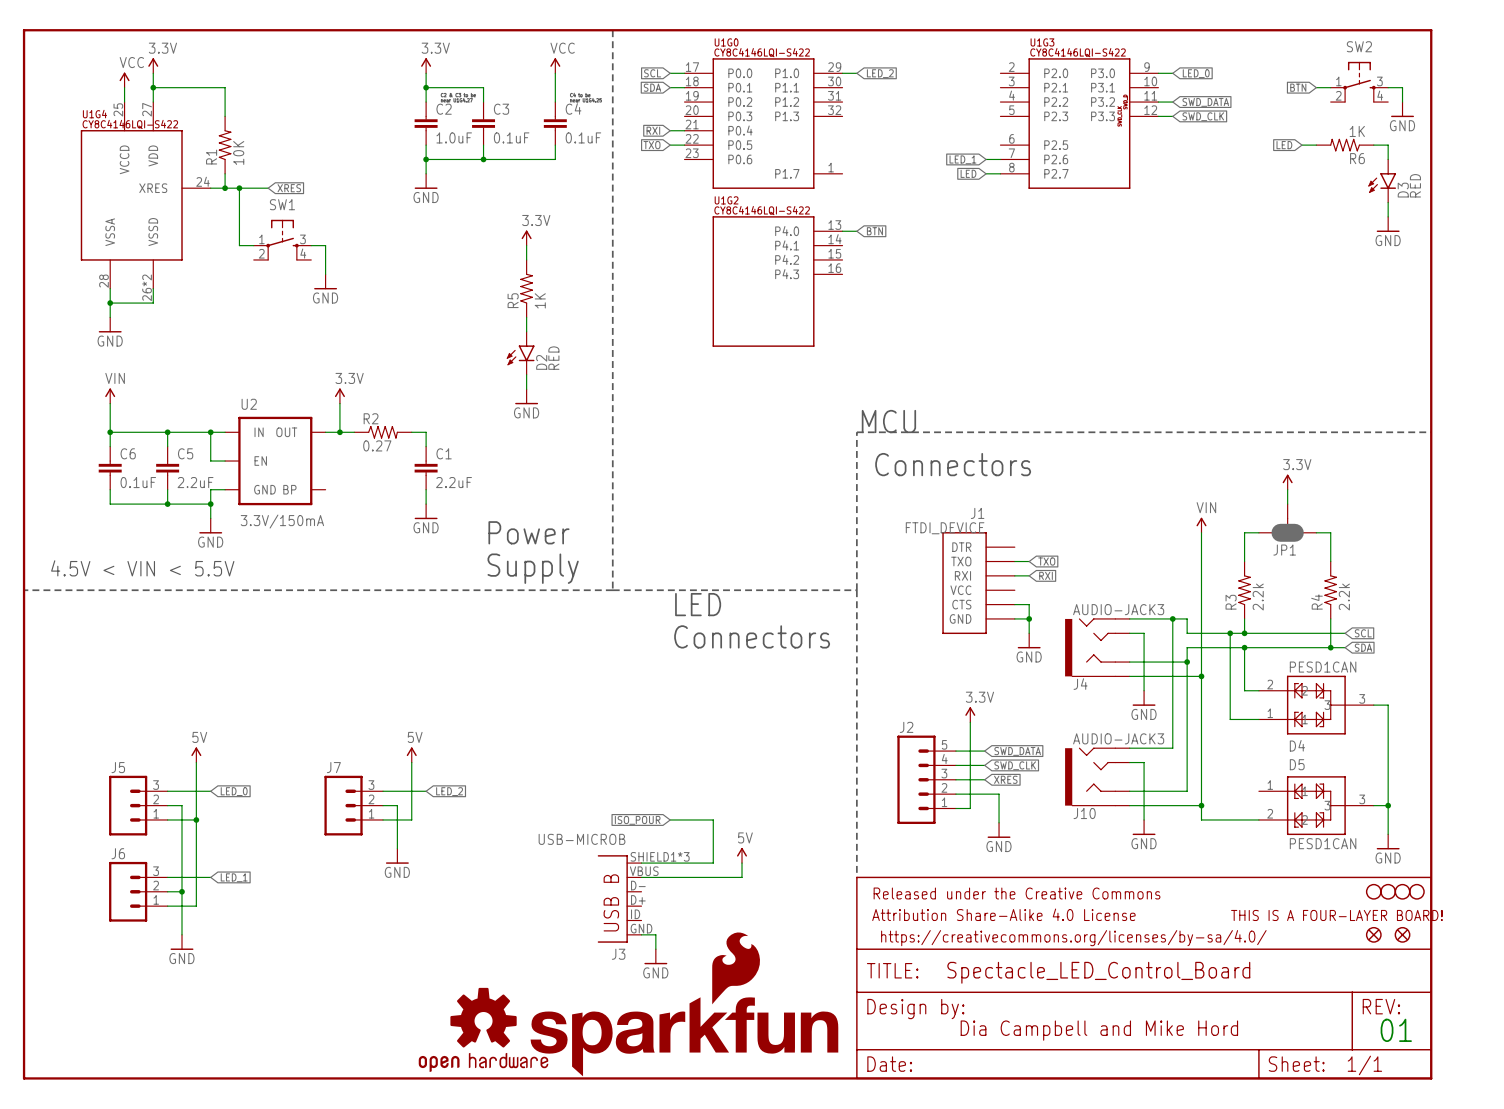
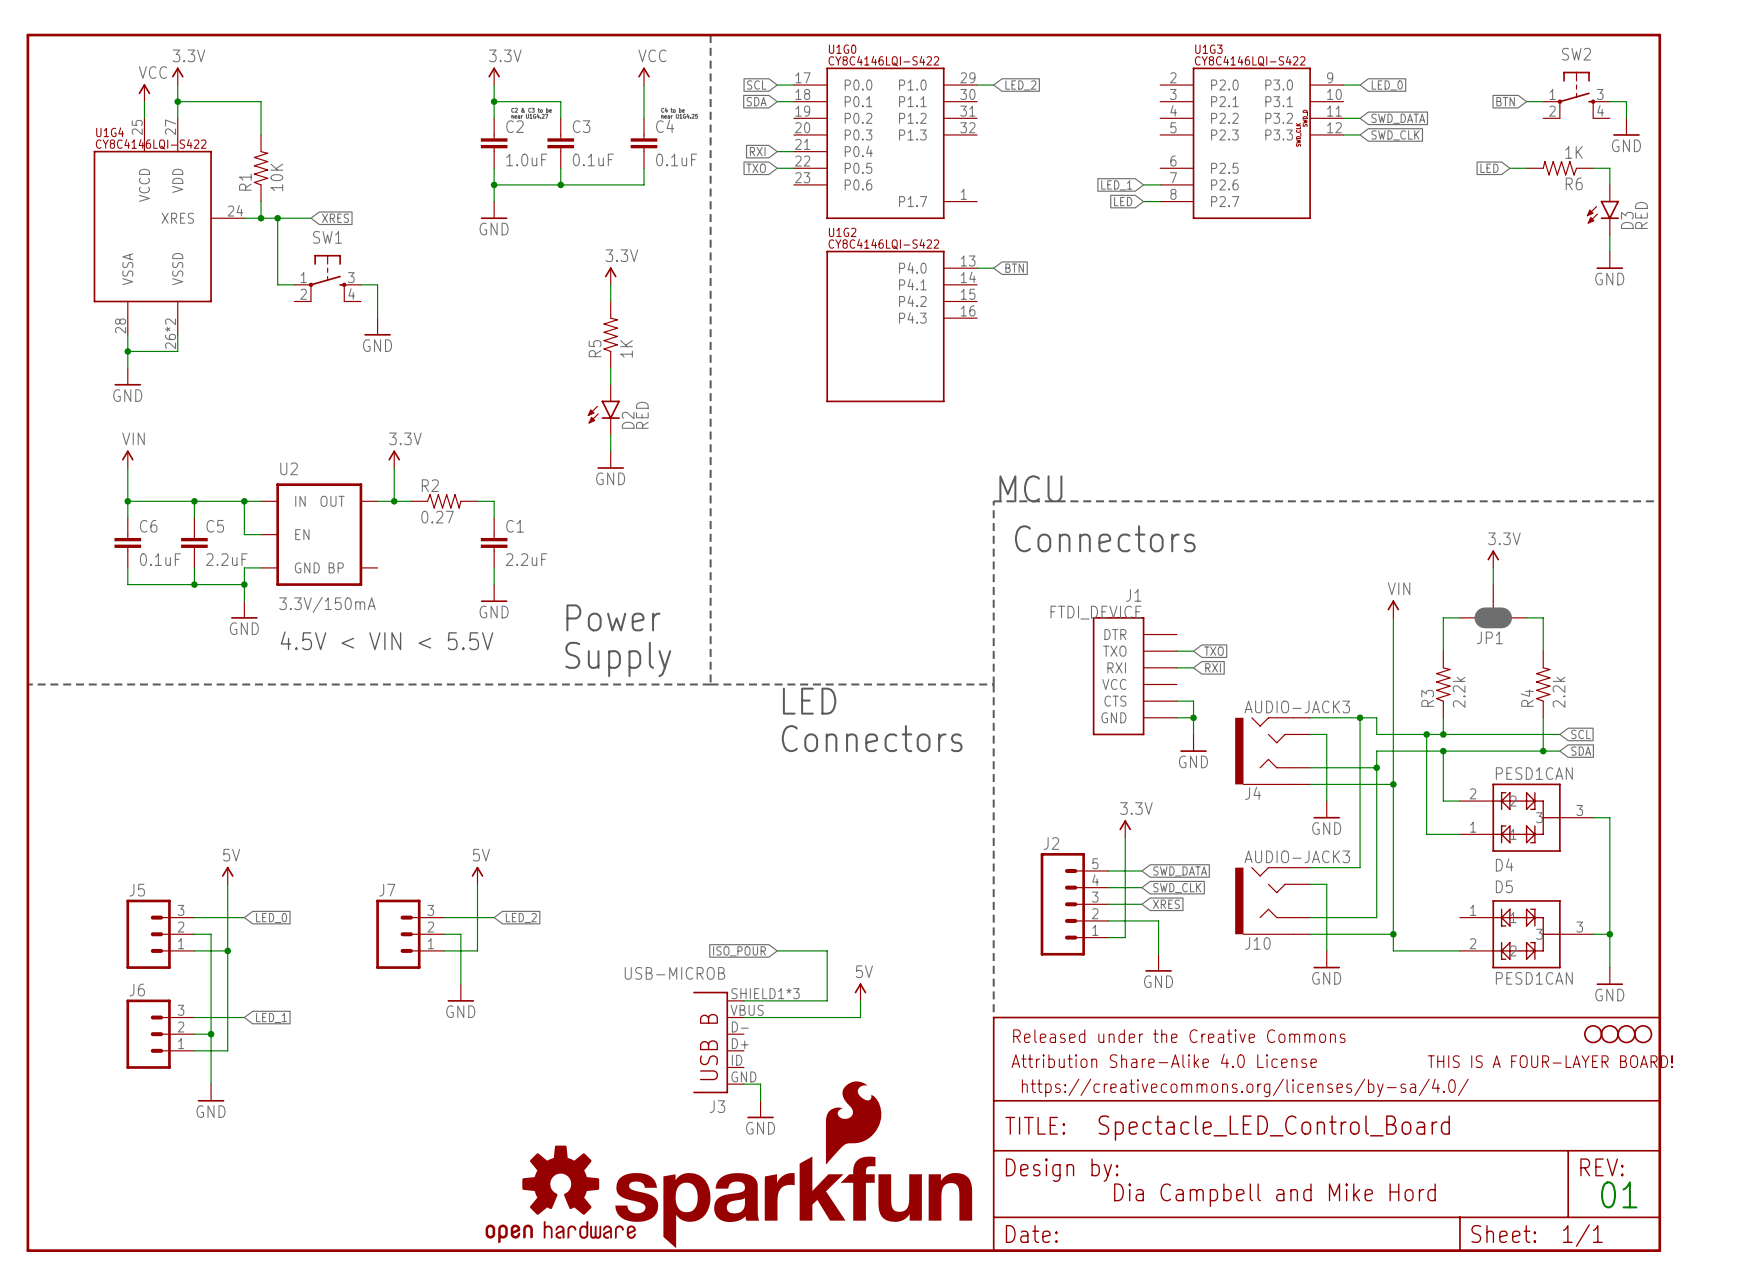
text: none -> 4.5V < VIN < 5.5V (387, 640)
text: 4.5V < VIN < 5.5V (142, 568) -> none
part: (1373, 934) -> none
part: (1402, 934) -> none

